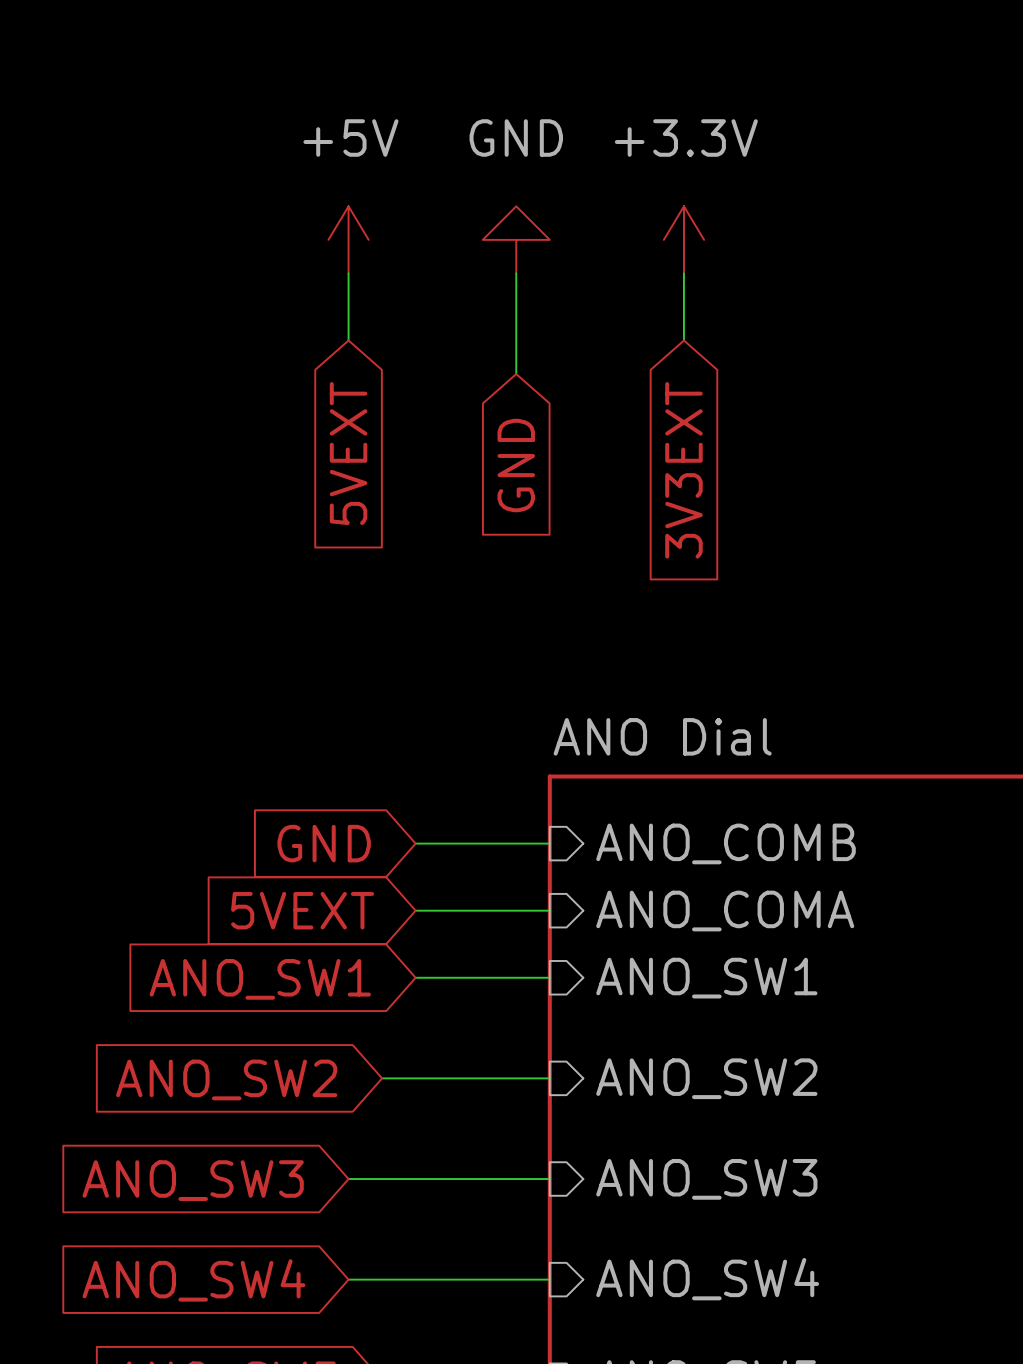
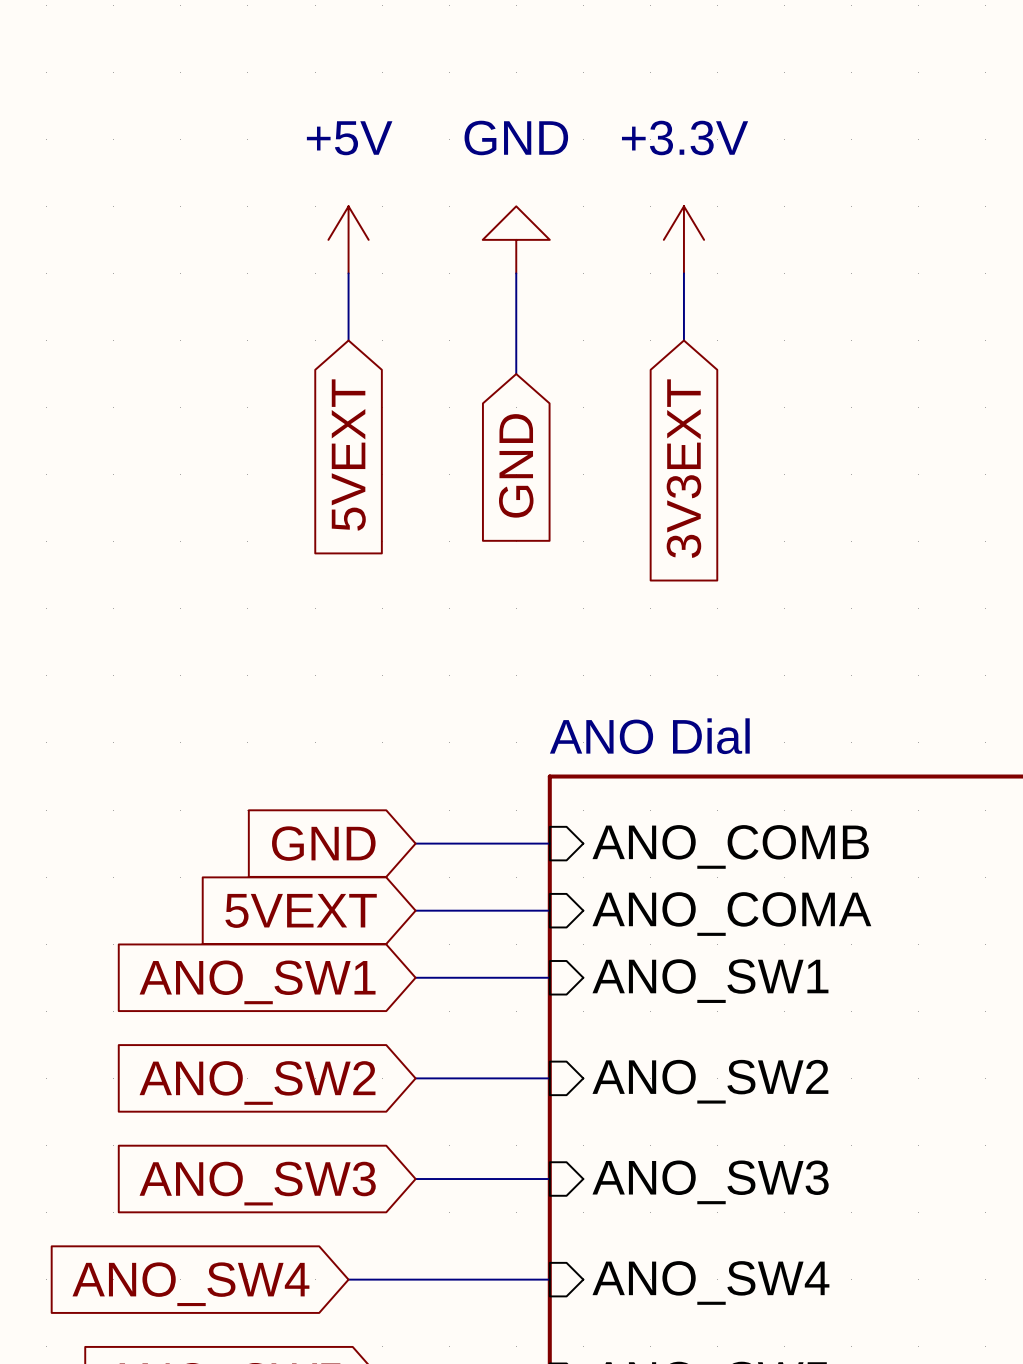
wire: (382, 1078) (415, 1078) -> none
global label position: ANO_SW2 (226, 1079) -> ANO_SW2 (257, 1082)
wire: (348, 1179) (415, 1179) -> none
global label position: ANO_SW3 (193, 1180) -> ANO_SW3 (257, 1183)

